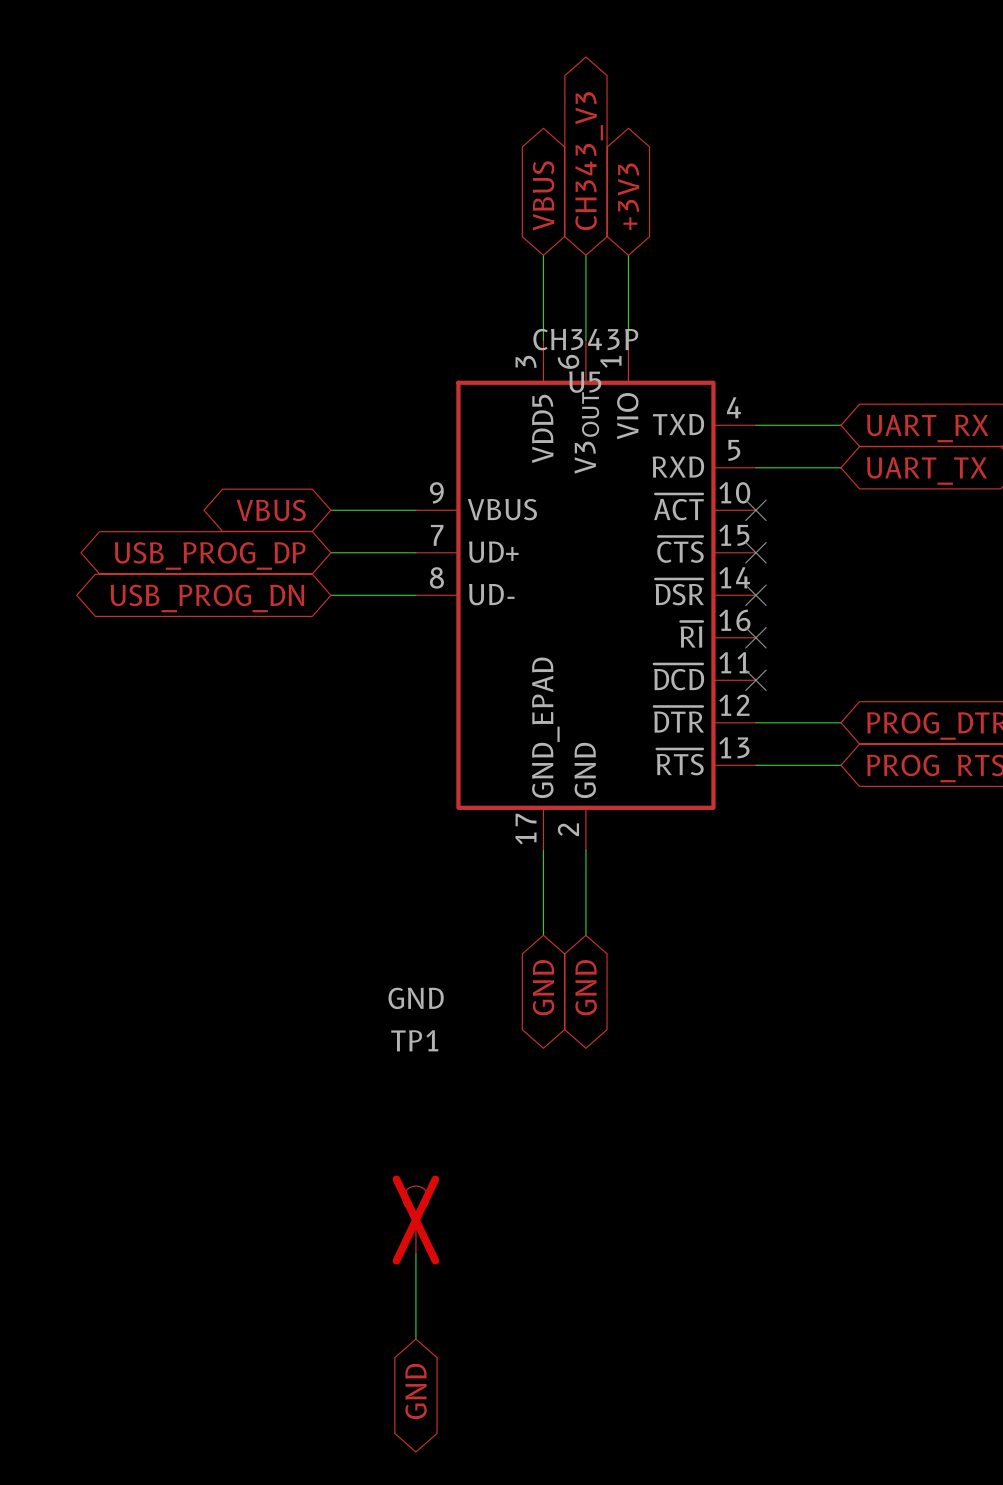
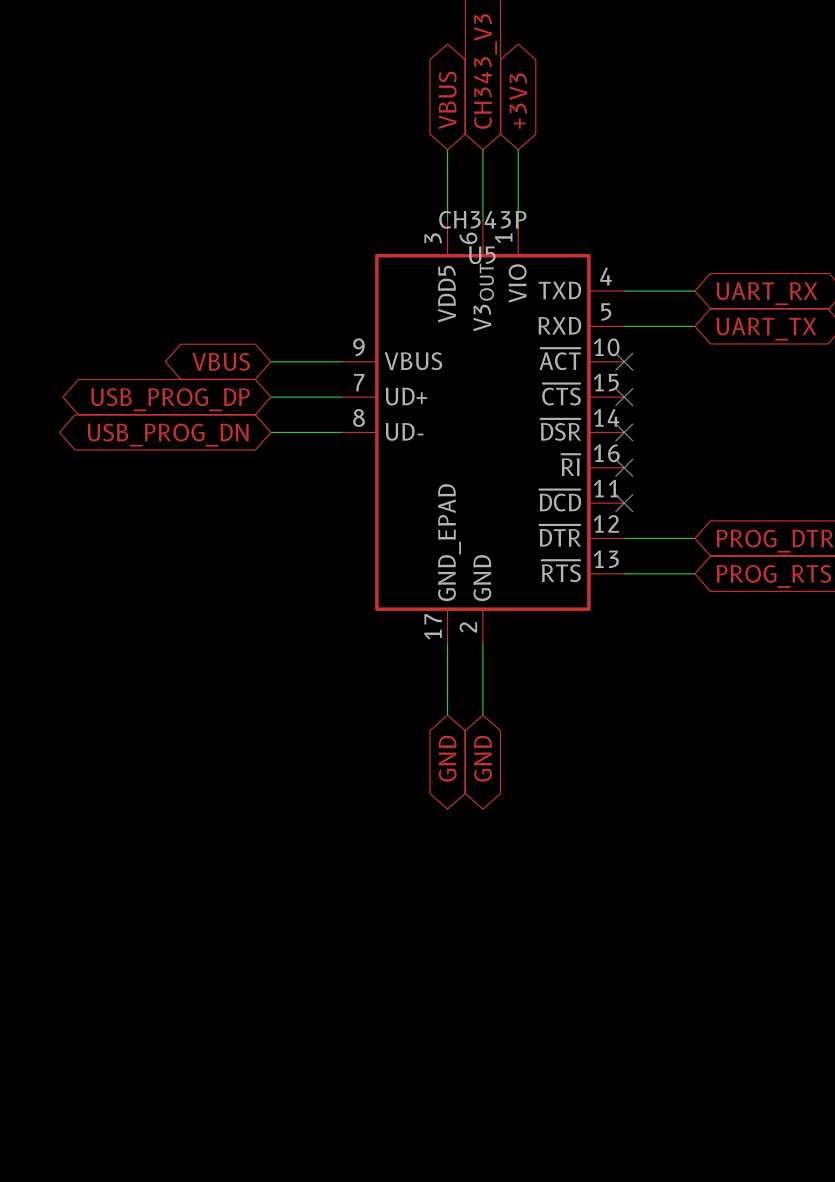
TP1: GND (415, 1220) -> none
wire: (415, 1254) (415, 1339) -> none
global label: GND (416, 1391) -> none

